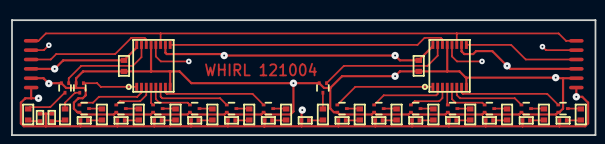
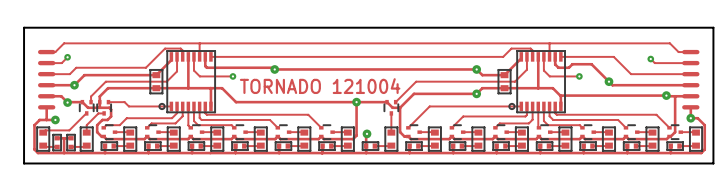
text: WHIRL 121004 (261, 69) -> TORNADO 121004 (320, 86)

